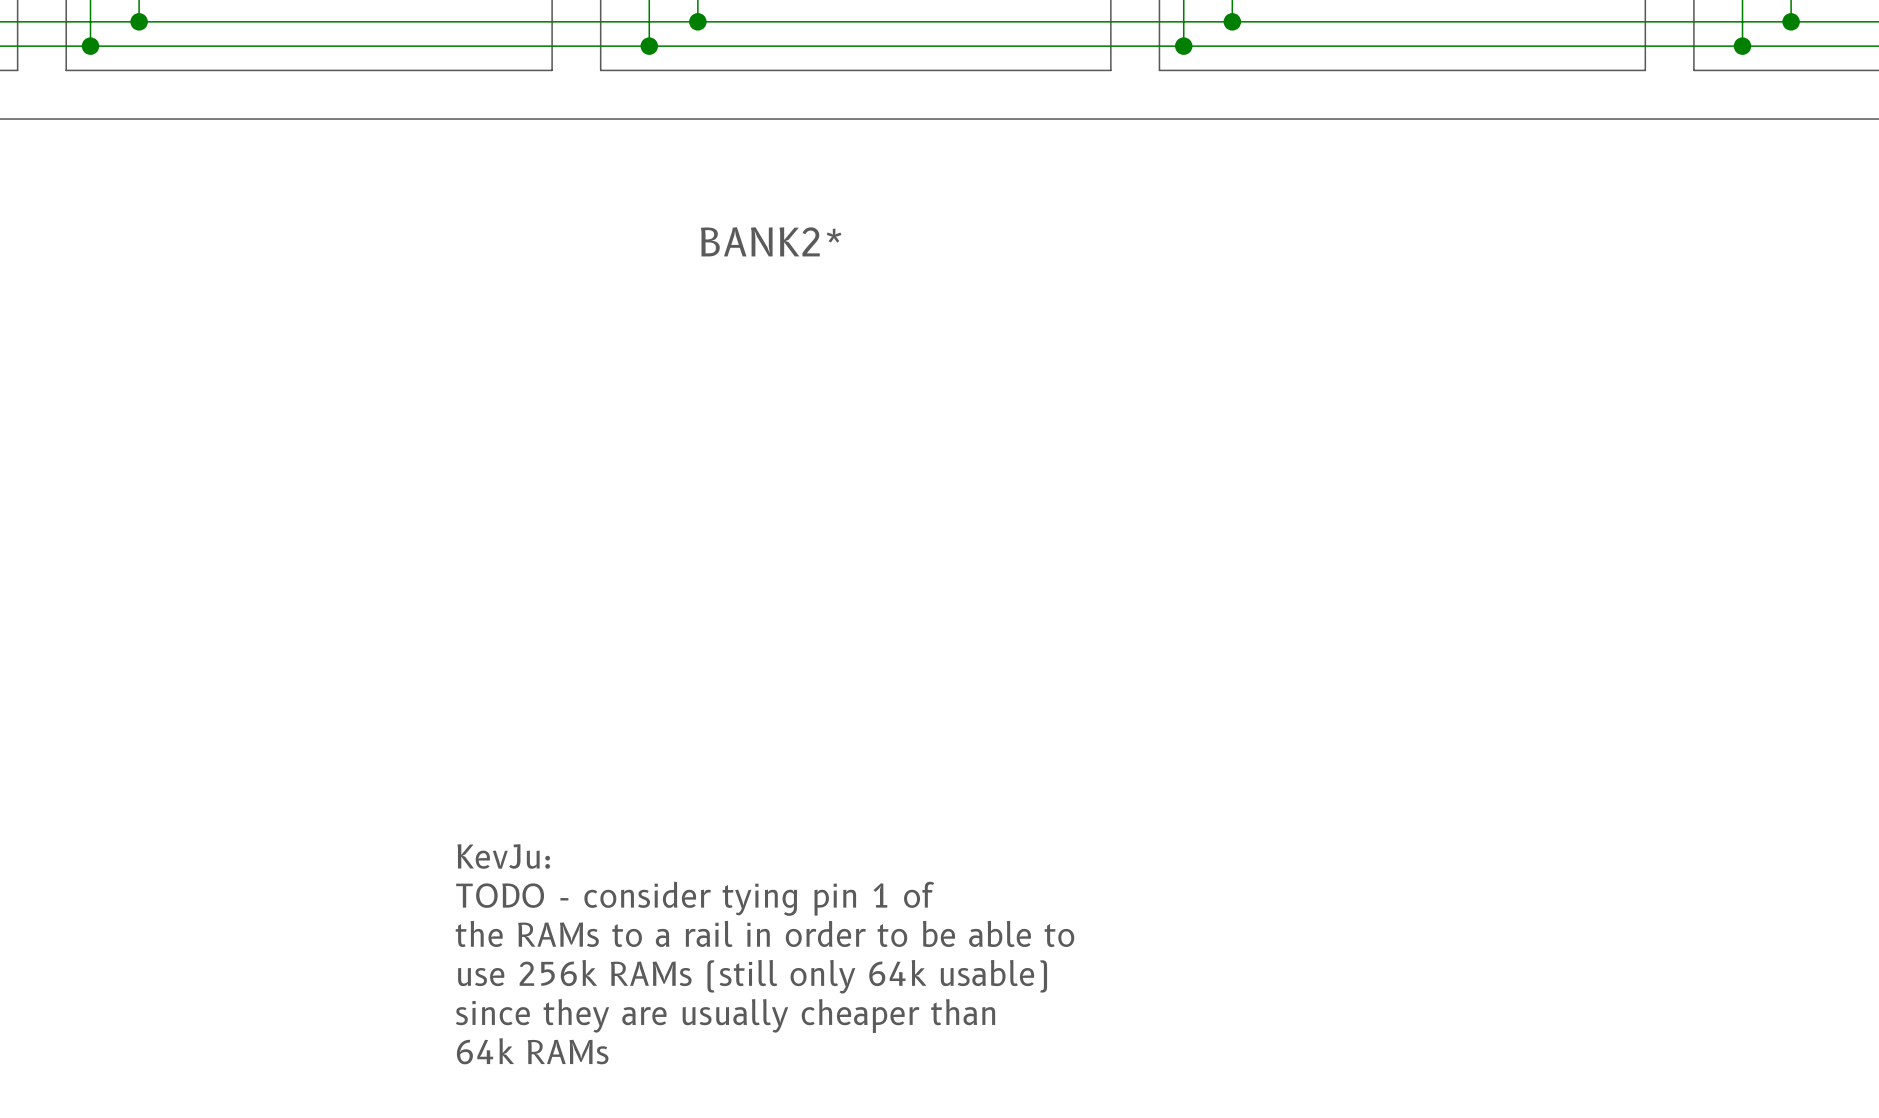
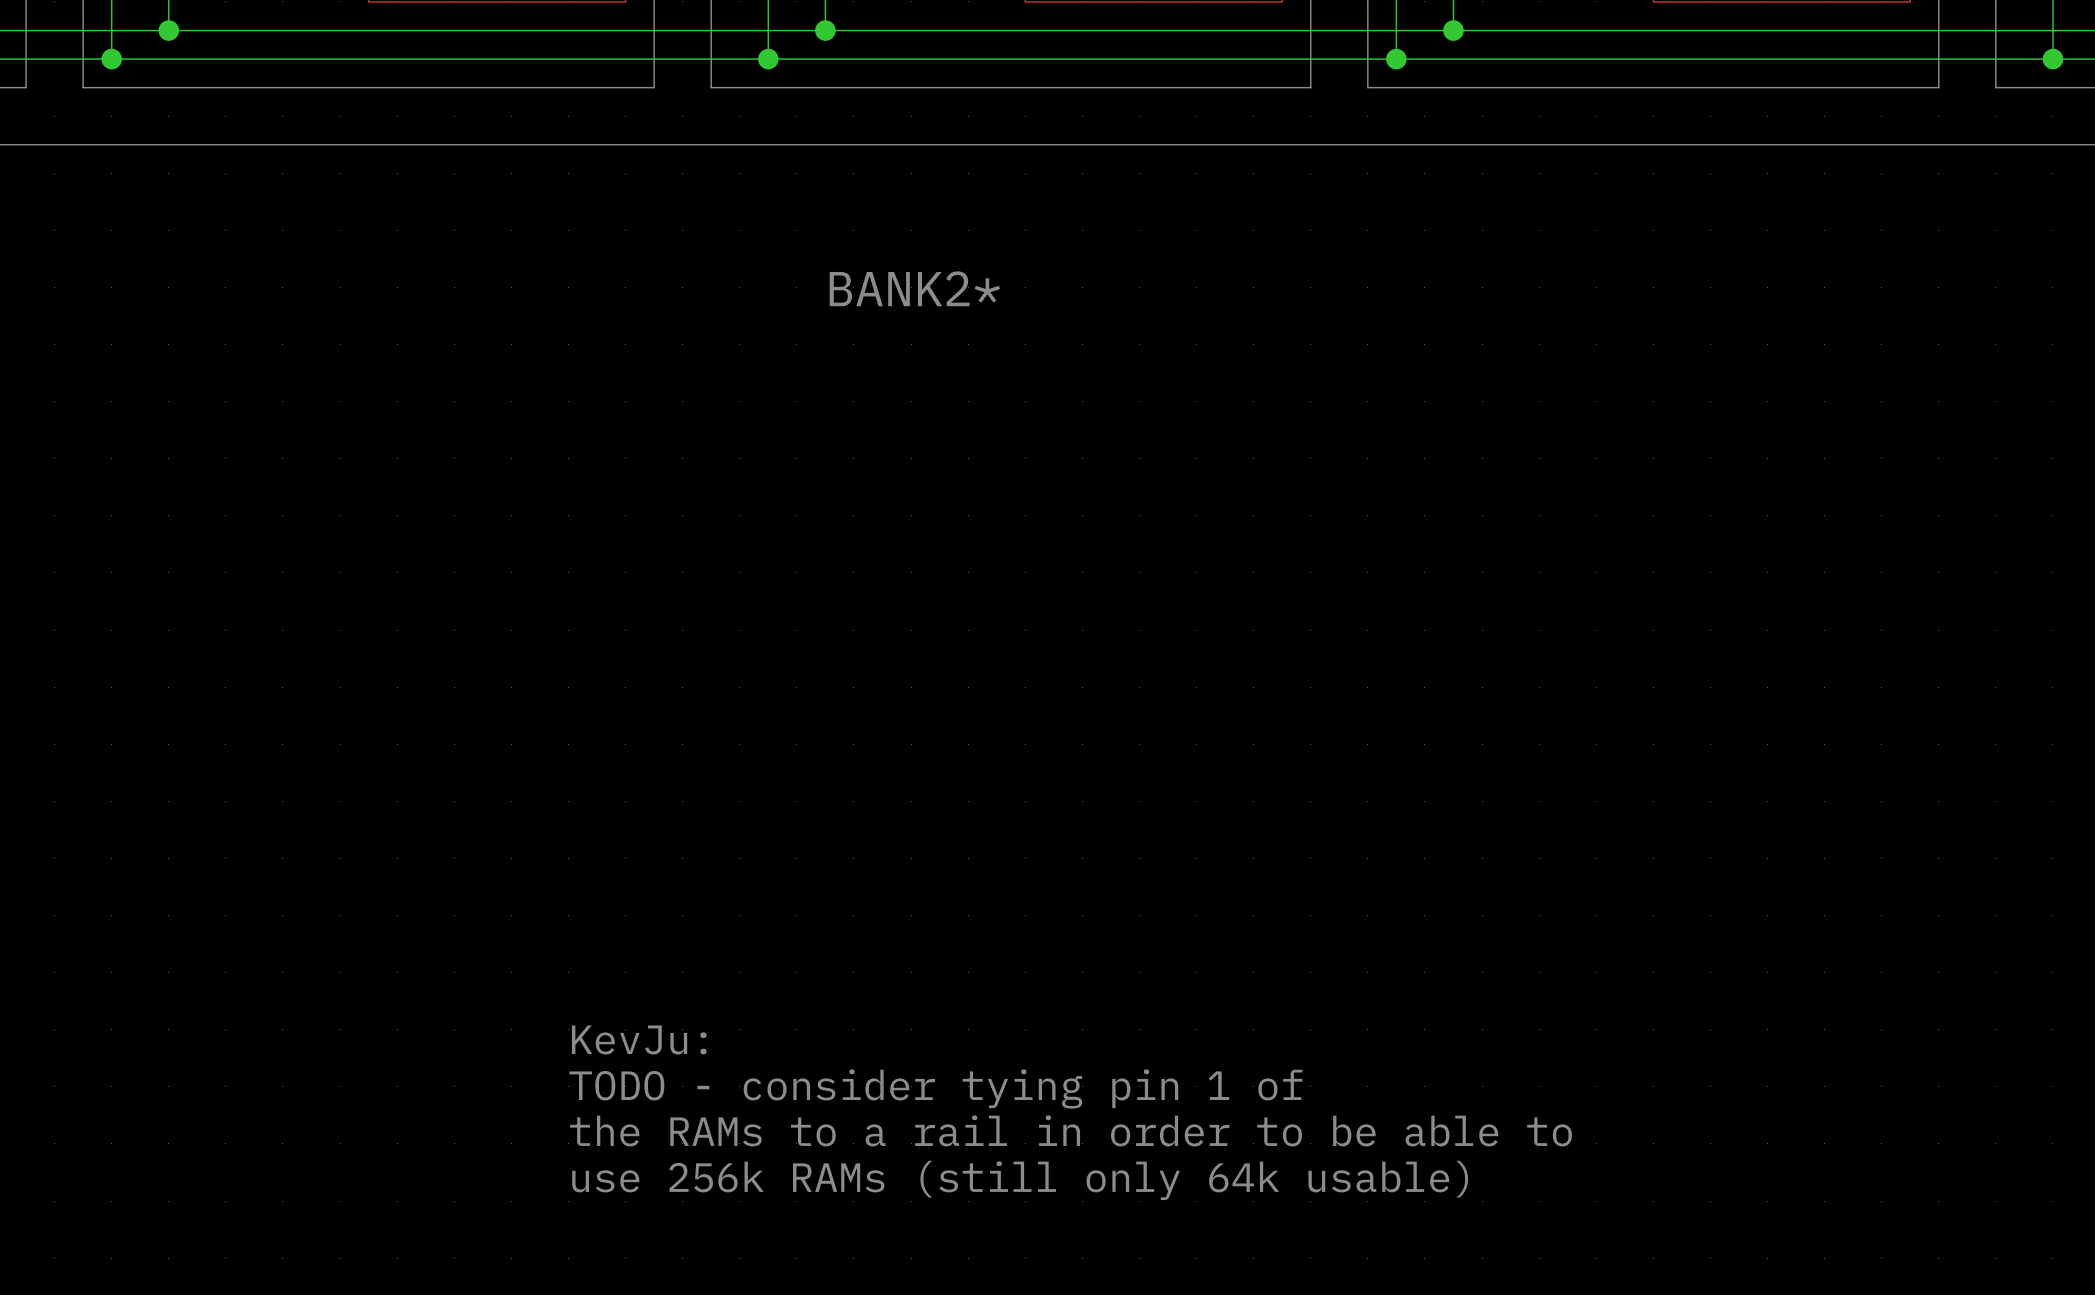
text position: KevJu: (503, 856) -> KevJu: (639, 1039)
text position: TODO - consider tying pin 1 of (695, 898) -> TODO - consider tying pin 1 of (935, 1089)
text position: the RAMs to a rail in order to be able to (764, 933) -> the RAMs to a rail in order to be able to (1071, 1130)
text position: use 256k RAMs (still only 64k usable) (752, 976) -> use 256k RAMs (still only 64k usable) (1020, 1180)
text: since they are usually cheaper than (725, 1016) -> none
text: 64k RAMs (532, 1051) -> none

